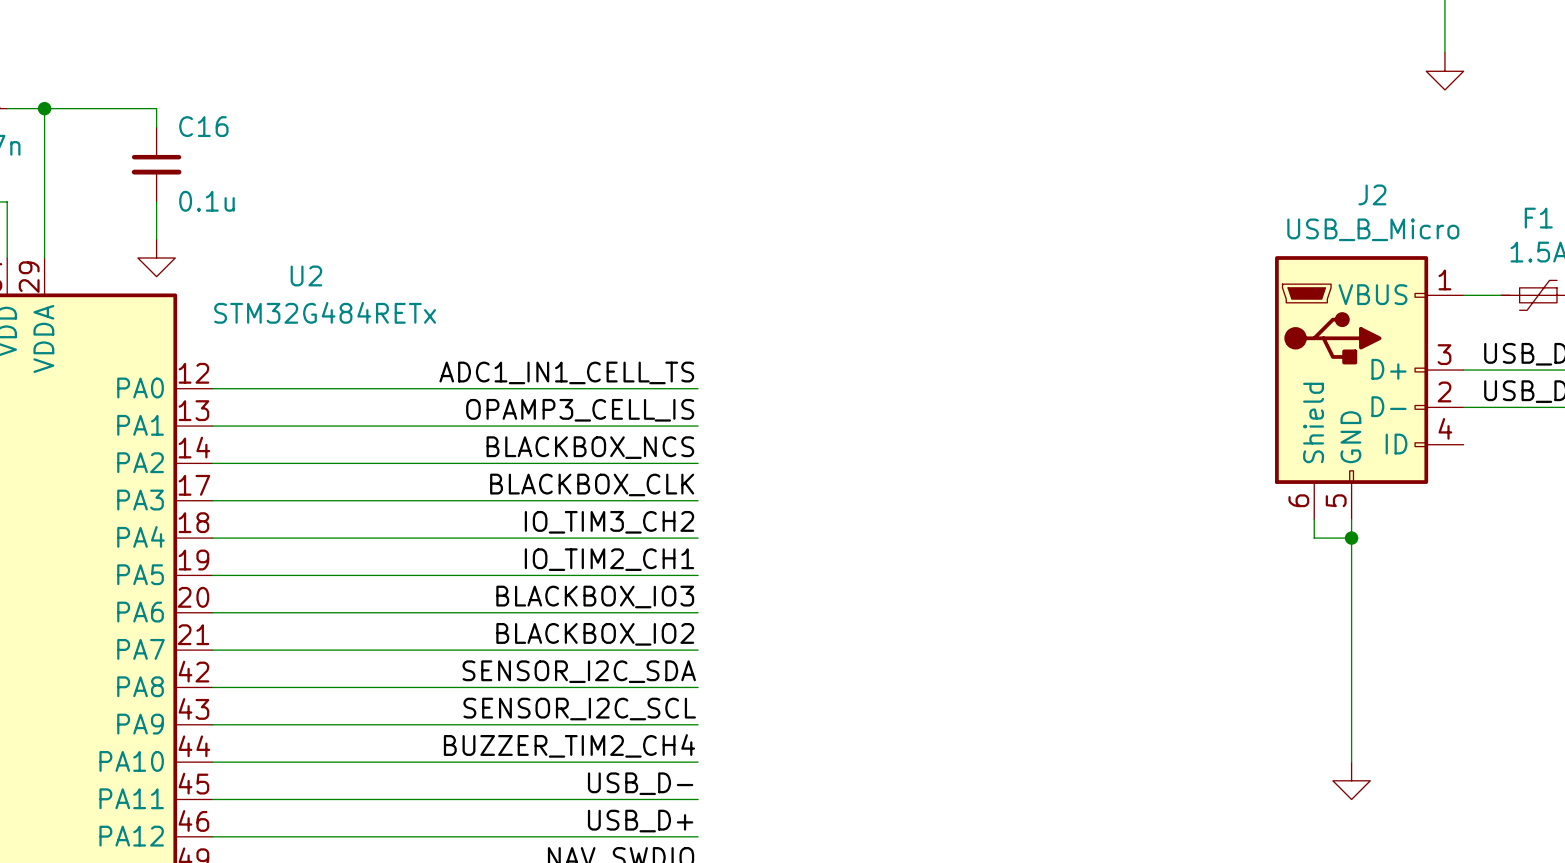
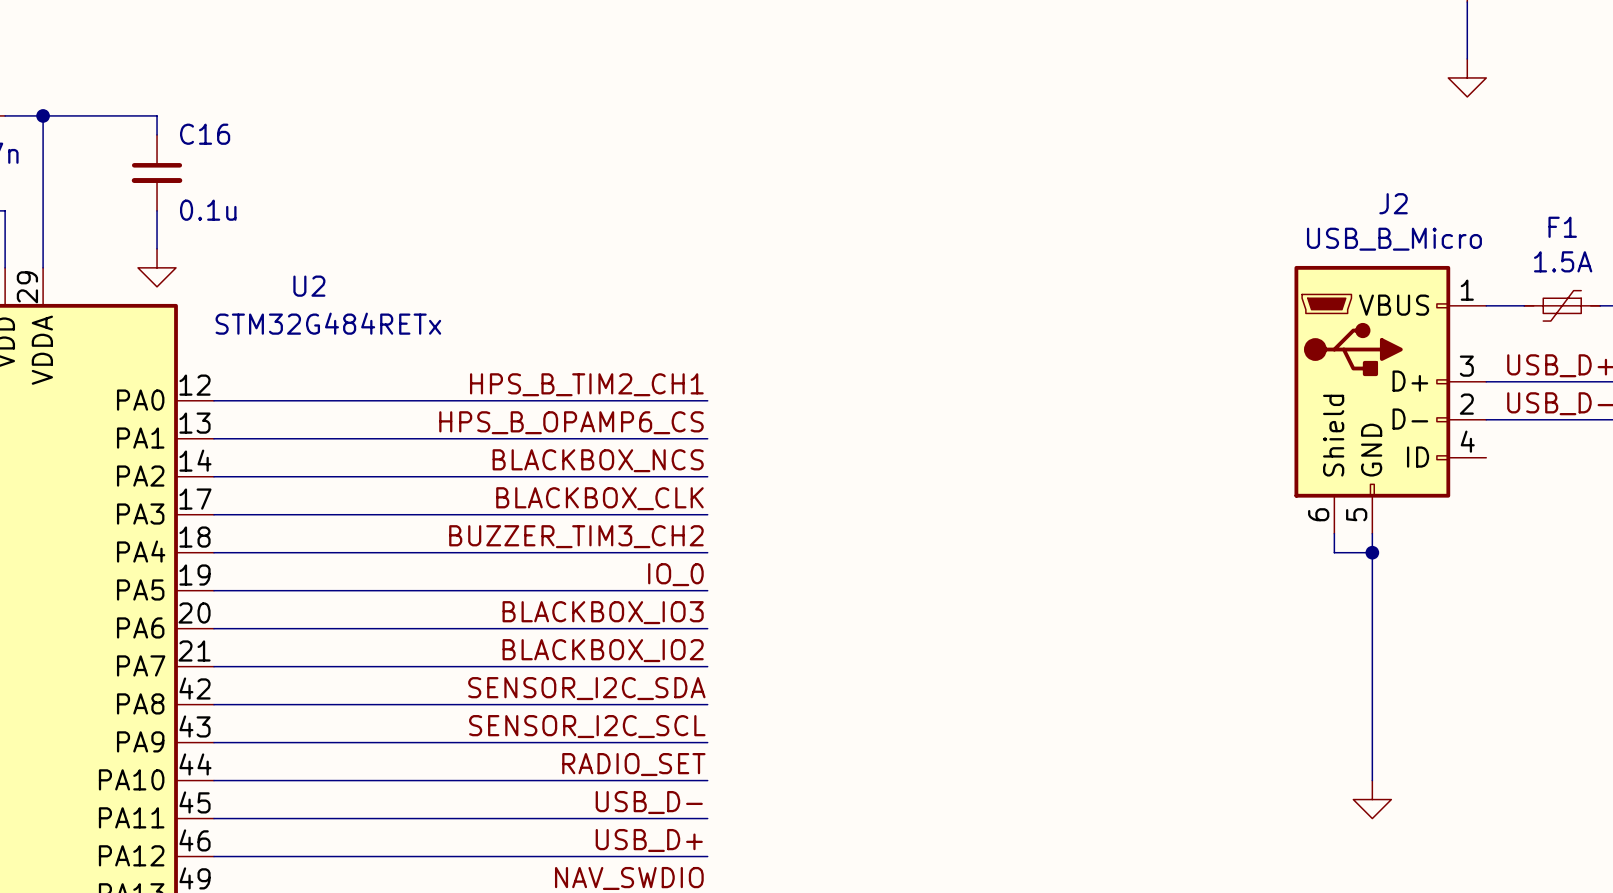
label: ADC1_IN1_CELL_TS (566, 372) -> HPS_B_TIM2_CH1 (586, 384)
label: OPAMP3_CELL_IS (580, 410) -> HPS_B_OPAMP6_CS (571, 422)
label: IO_TIM3_CH2 (609, 522) -> BUZZER_TIM3_CH2 (576, 536)
label: IO_TIM2_CH1 (609, 559) -> IO_0 (675, 574)
label: BUZZER_TIM2_CH4 (569, 745) -> RADIO_SET (633, 764)

